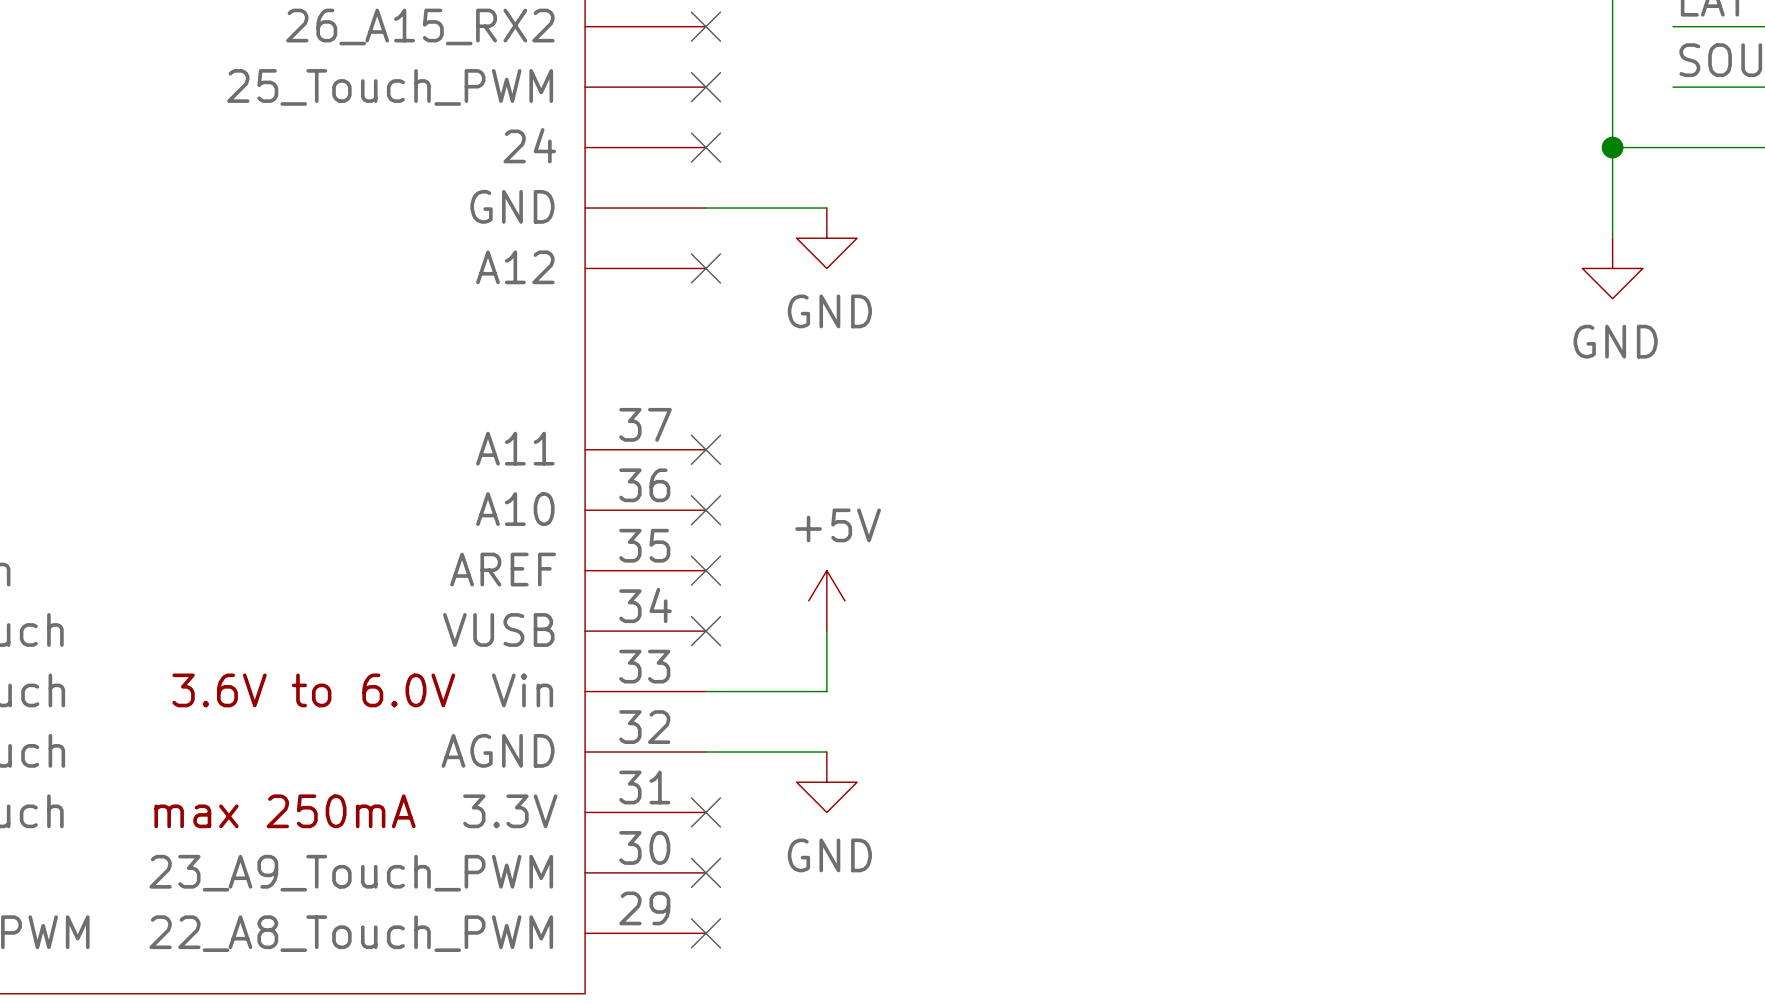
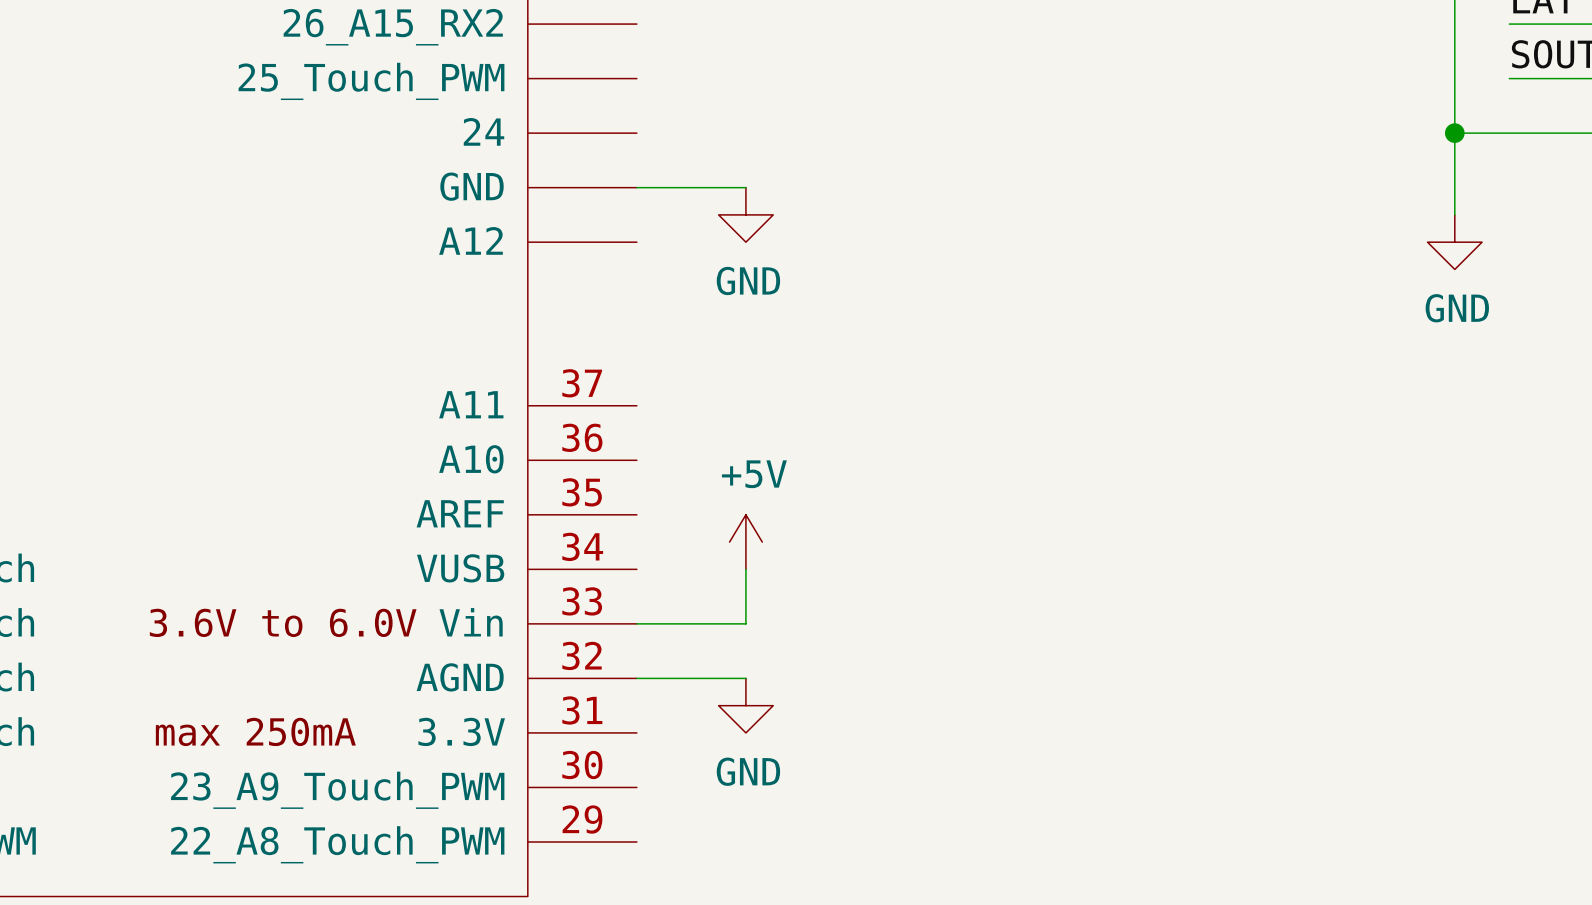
no-connect mark: (705, 26) -> none
no-connect mark: (705, 87) -> none
no-connect mark: (705, 147) -> none
no-connect mark: (705, 268) -> none
no-connect mark: (705, 449) -> none
no-connect mark: (705, 510) -> none
no-connect mark: (705, 570) -> none
no-connect mark: (705, 631) -> none
no-connect mark: (705, 812) -> none
no-connect mark: (705, 872) -> none
no-connect mark: (705, 933) -> none

